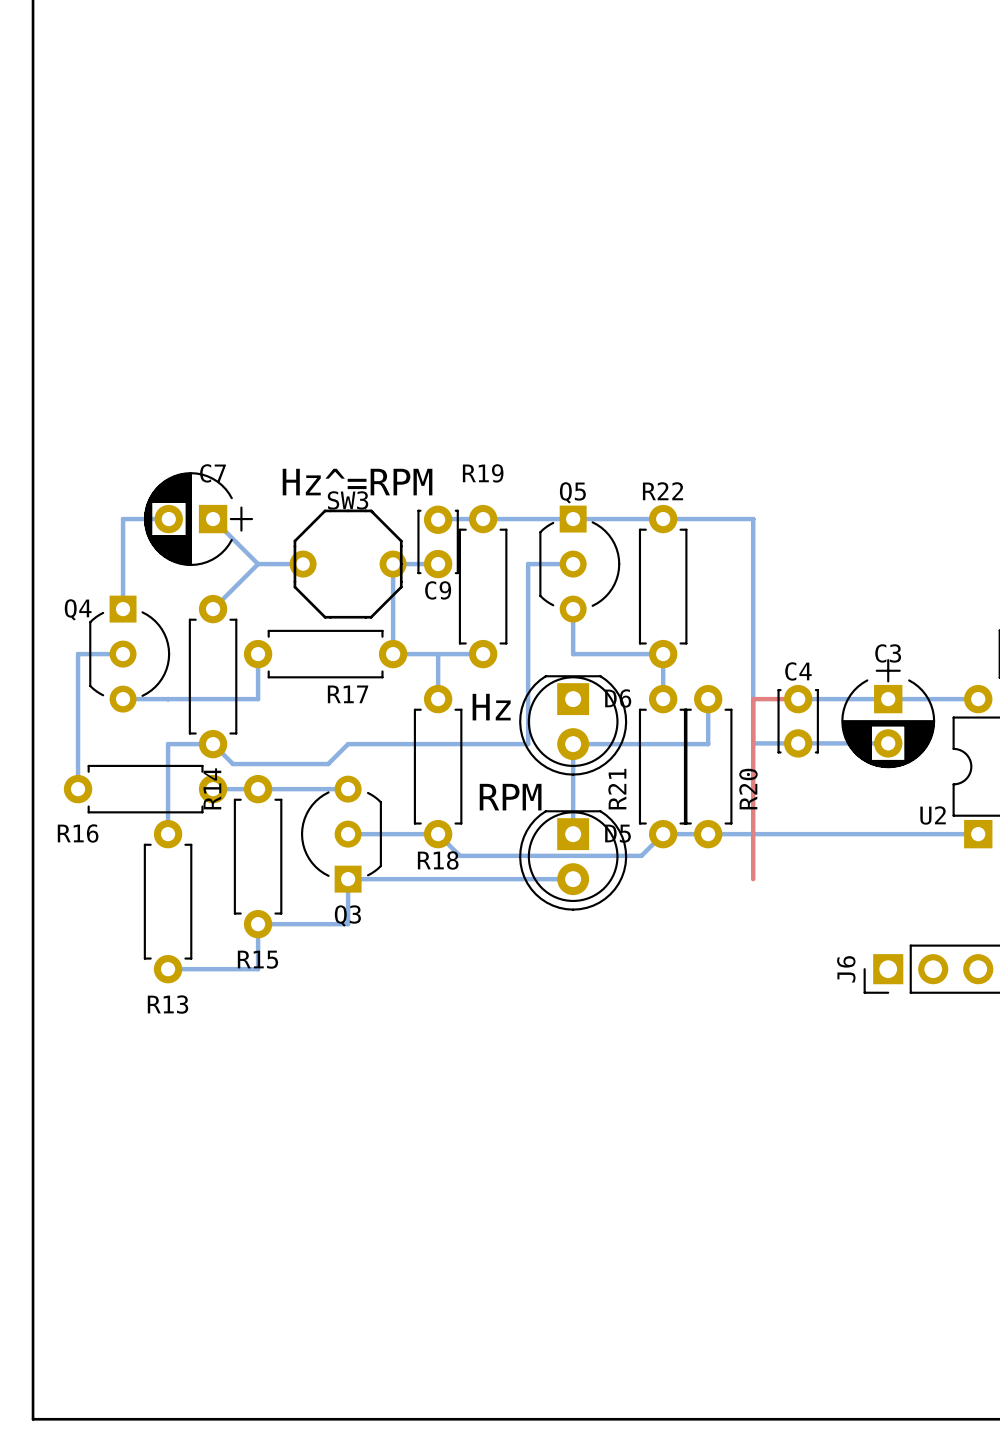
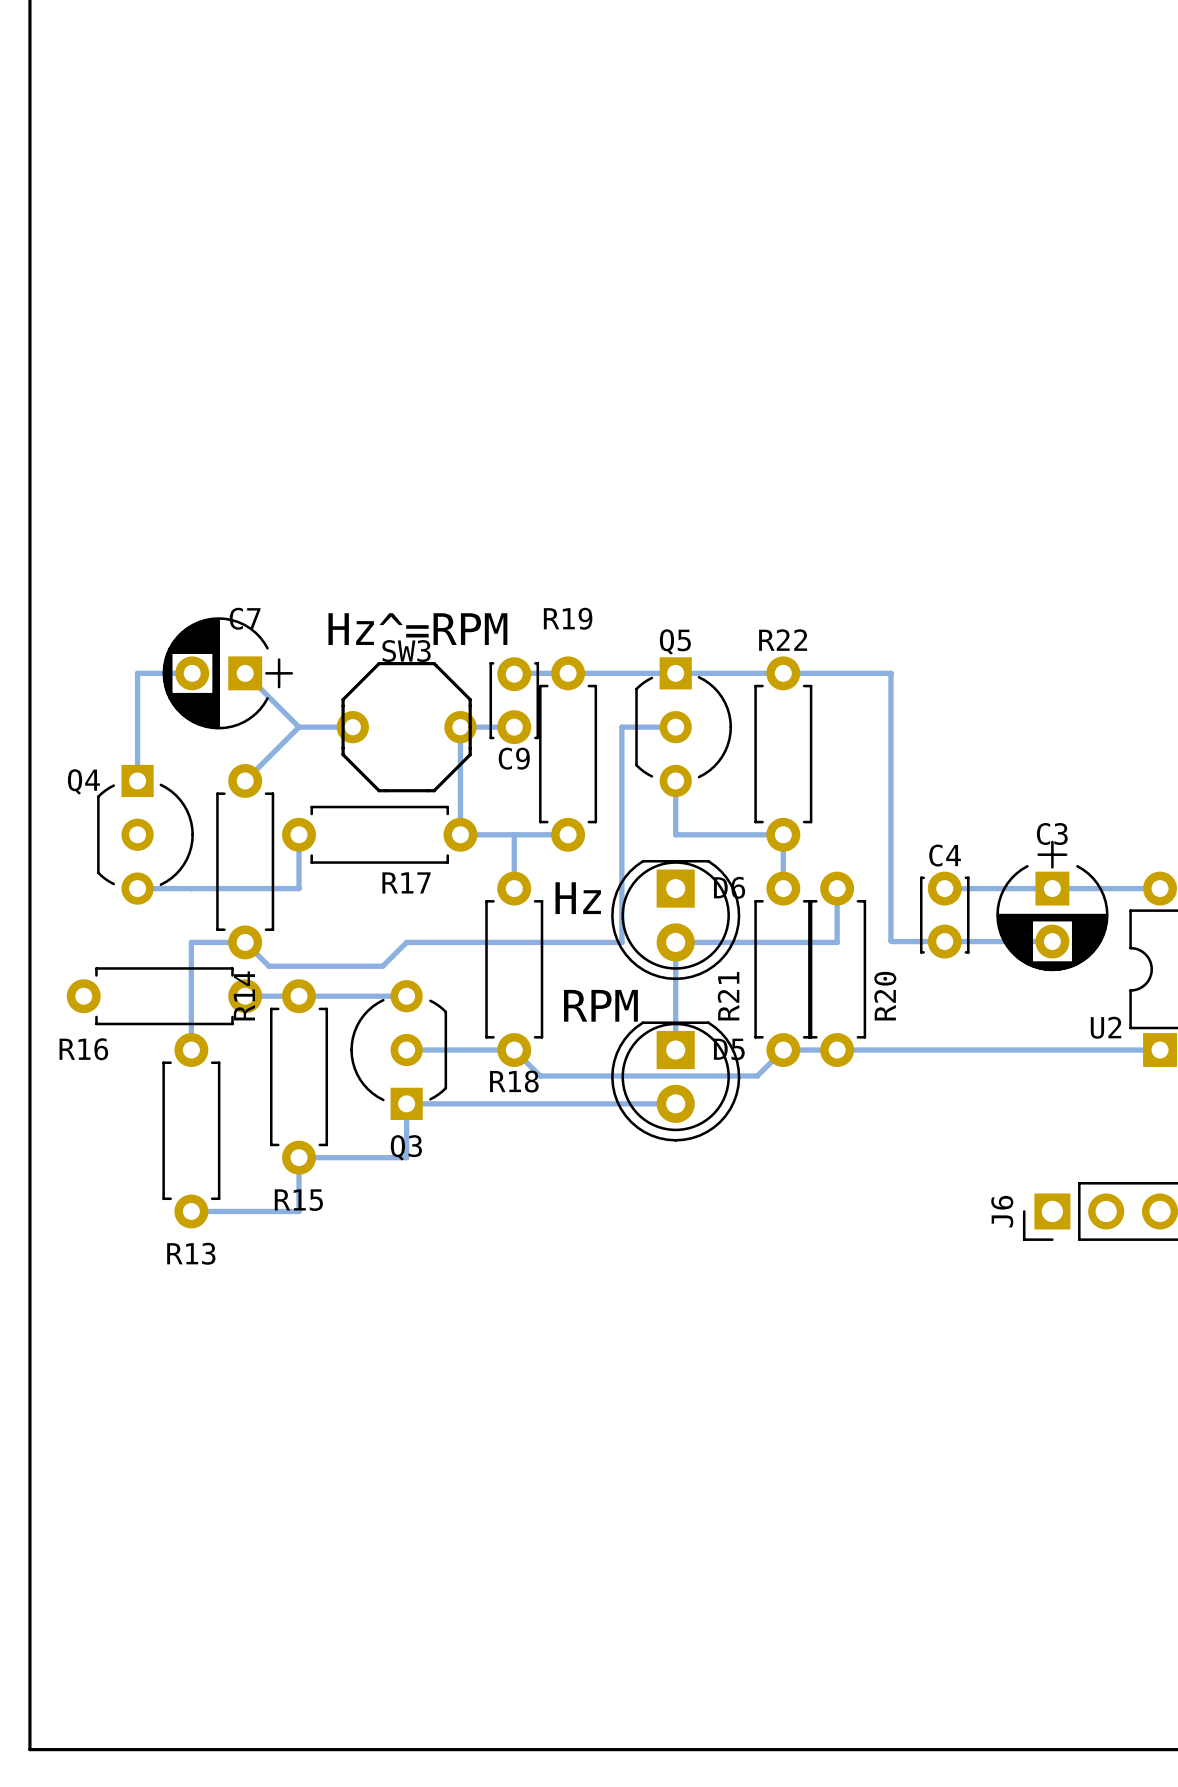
bottom track: (123, 654) (78, 654) (78, 789) -> none
top track: (798, 699) (753, 699) (753, 879) -> none

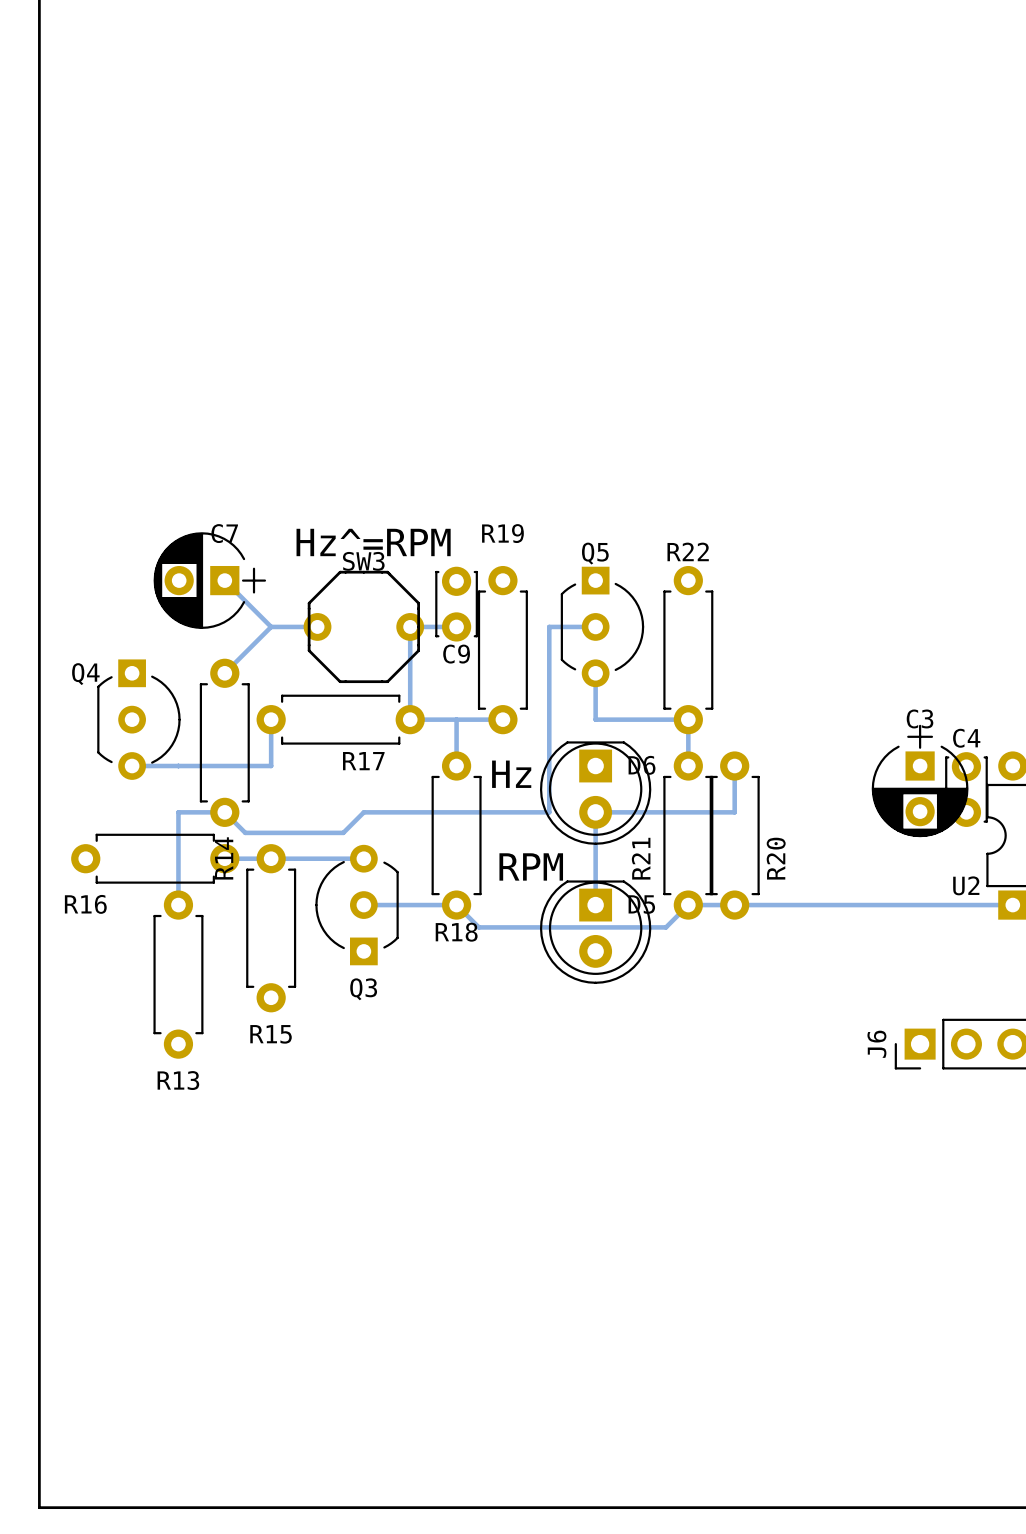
bottom track: (192, 673) (137, 673) (137, 780) -> none
bottom track: (514, 673) (890, 673) (890, 940) (1052, 941) -> none
bottom track: (944, 888) (1160, 888) -> none
C4 position: (944, 915) -> (966, 789)
bottom track: (675, 1103) (406, 1103) (406, 1157) (299, 1157) (299, 1211) (191, 1211) -> none

